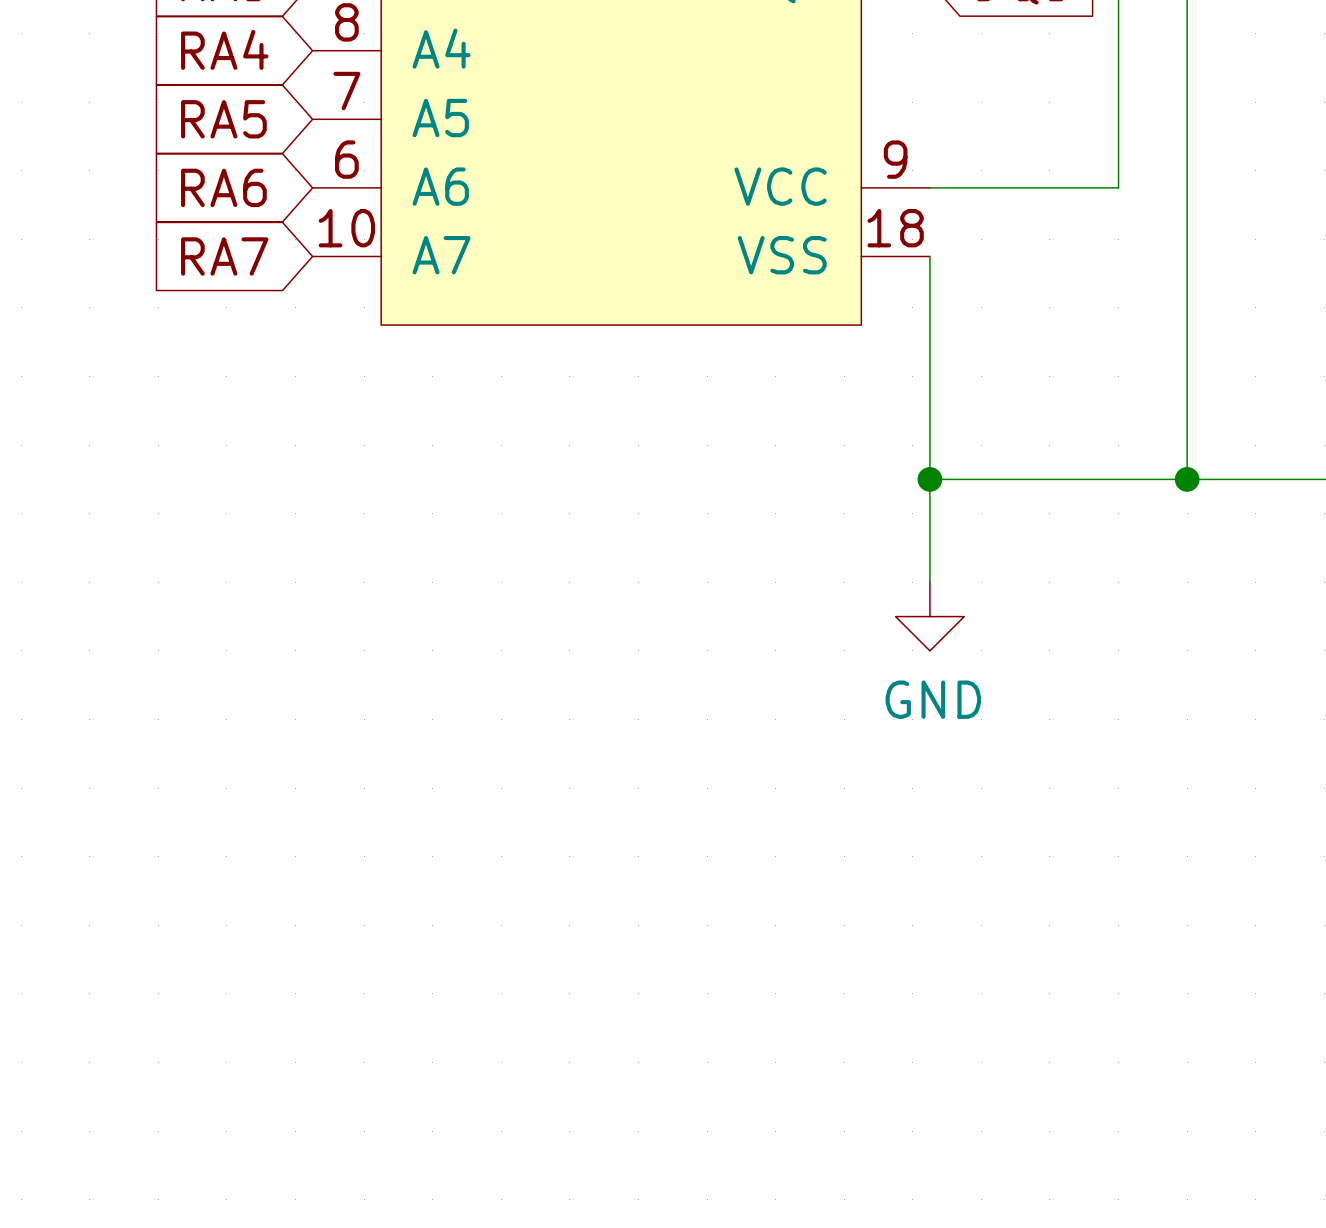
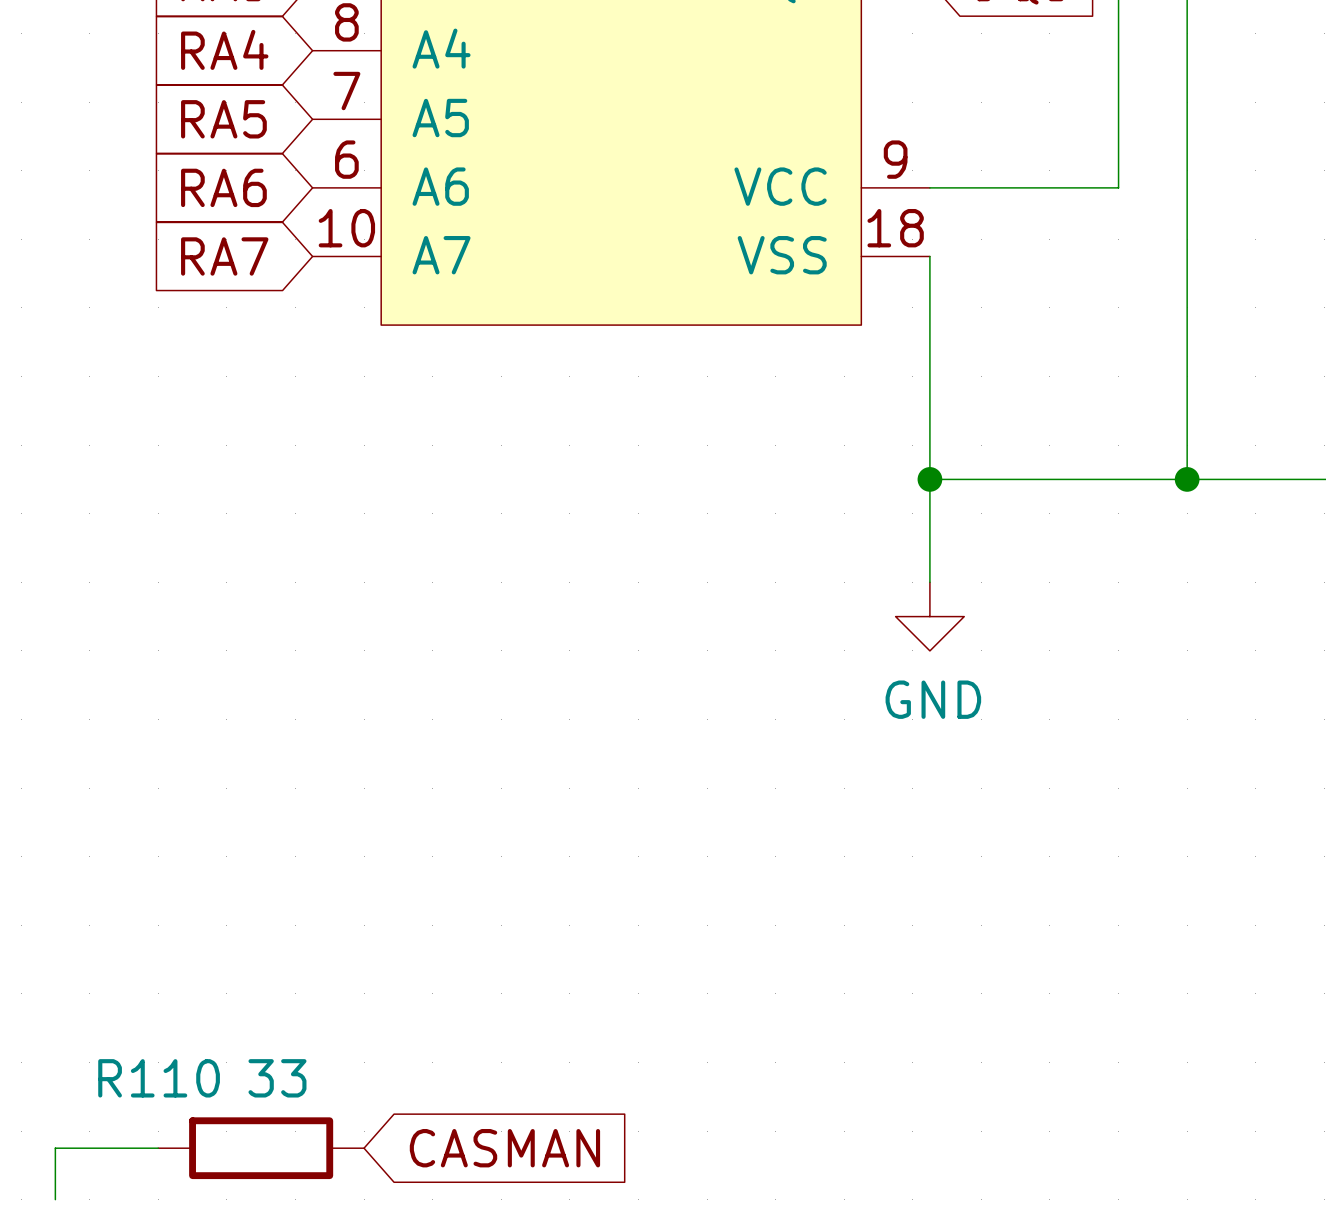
wire: none -> (158, 1148) (55, 1148) (55, 1199)
R110: none -> 33 (261, 1148)
global label: none -> CASMAN (504, 1148)

